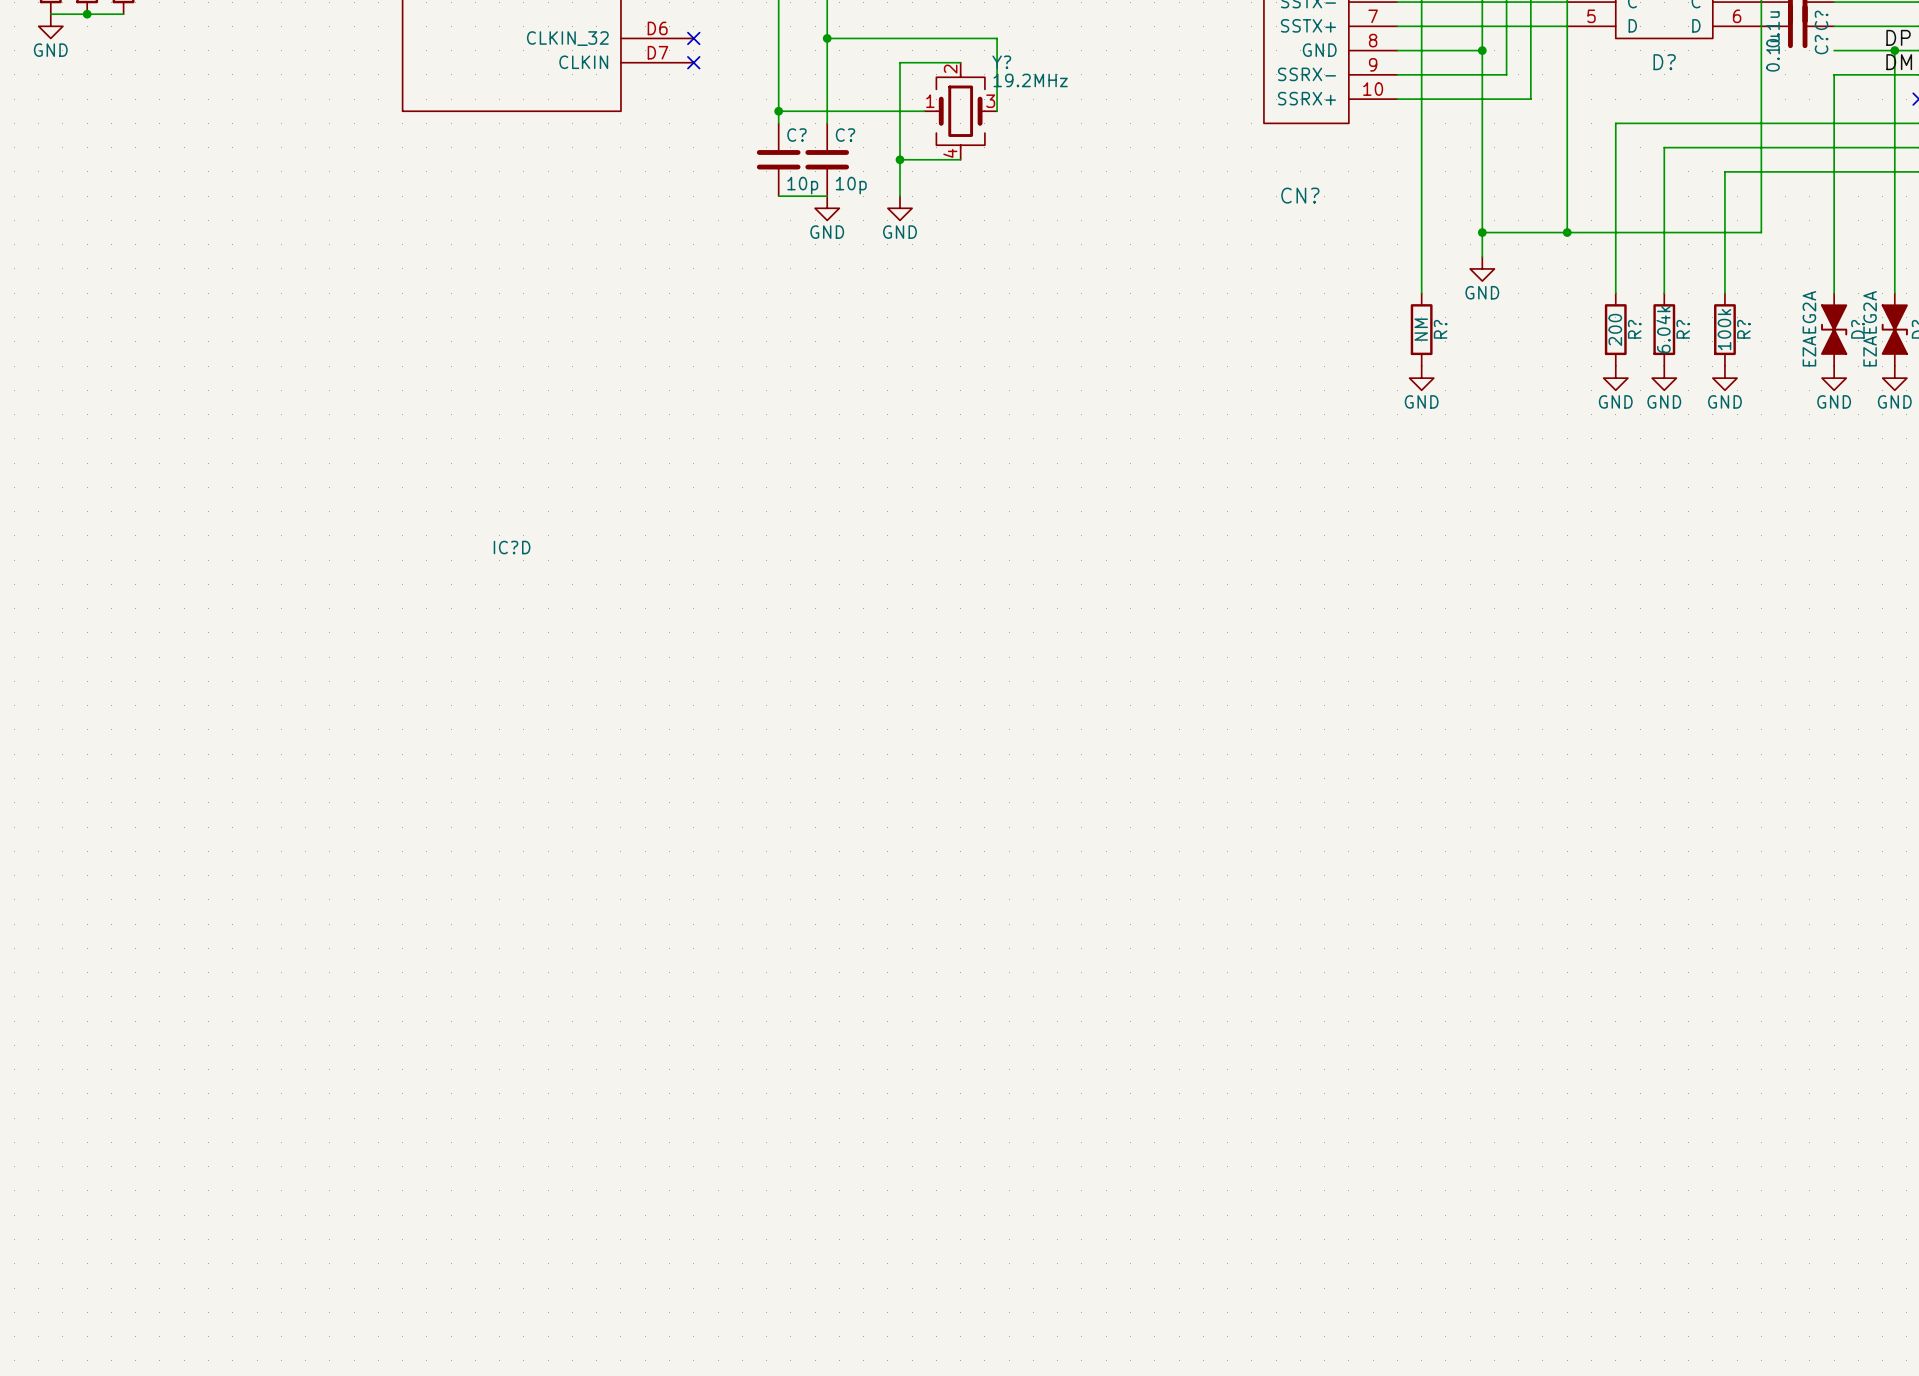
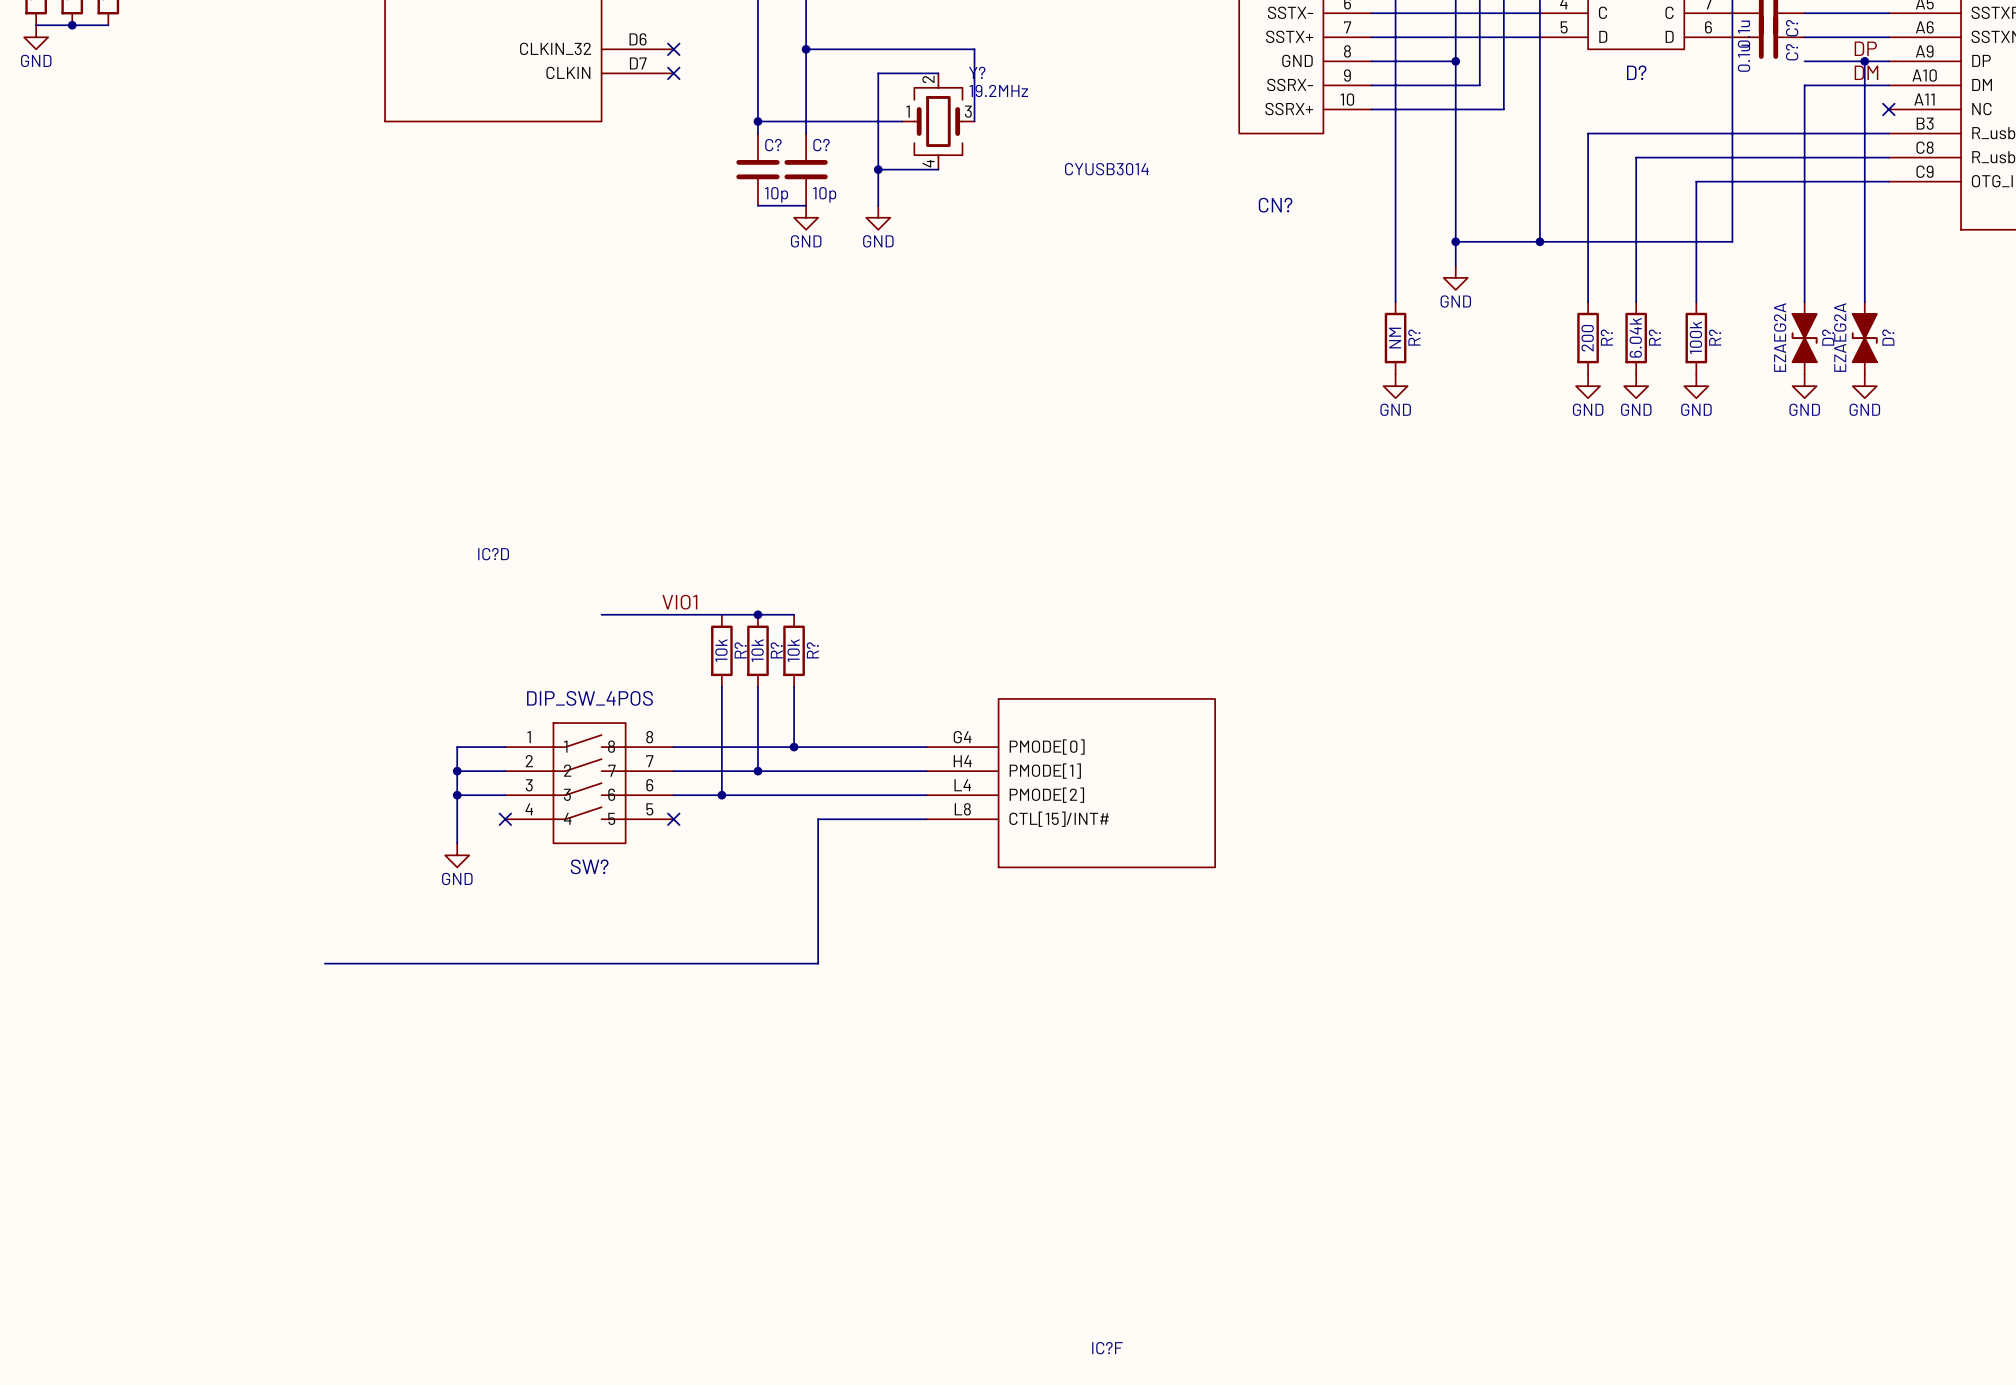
label: none -> VIO1 (679, 602)
wire: none -> (601, 614) (794, 614)
junction: none -> (757, 614)
R?: none -> 10k (721, 650)
R?: none -> 10k (757, 650)
R?: none -> 10k (794, 650)
wire: none -> (721, 686) (721, 795)
wire: none -> (757, 686) (757, 771)
wire: none -> (794, 686) (794, 747)
wire: none -> (505, 747) (457, 747) (457, 843)
wire: none -> (673, 747) (926, 747)
junction: none -> (794, 747)
wire: none -> (457, 771) (505, 771)
junction: none -> (457, 771)
wire: none -> (673, 771) (926, 771)
junction: none -> (757, 771)
SW?: none -> DIP_SW_4POS (589, 783)
IC?F: none -> CYUSB3014 (1070, 783)
wire: none -> (457, 795) (505, 795)
junction: none -> (457, 795)
wire: none -> (673, 795) (926, 795)
junction: none -> (721, 795)
no-connect mark: none -> (505, 819)
no-connect mark: none -> (673, 819)
wire: none -> (926, 819) (818, 819) (818, 963) (324, 963)
power symbol: none -> GND (457, 855)

